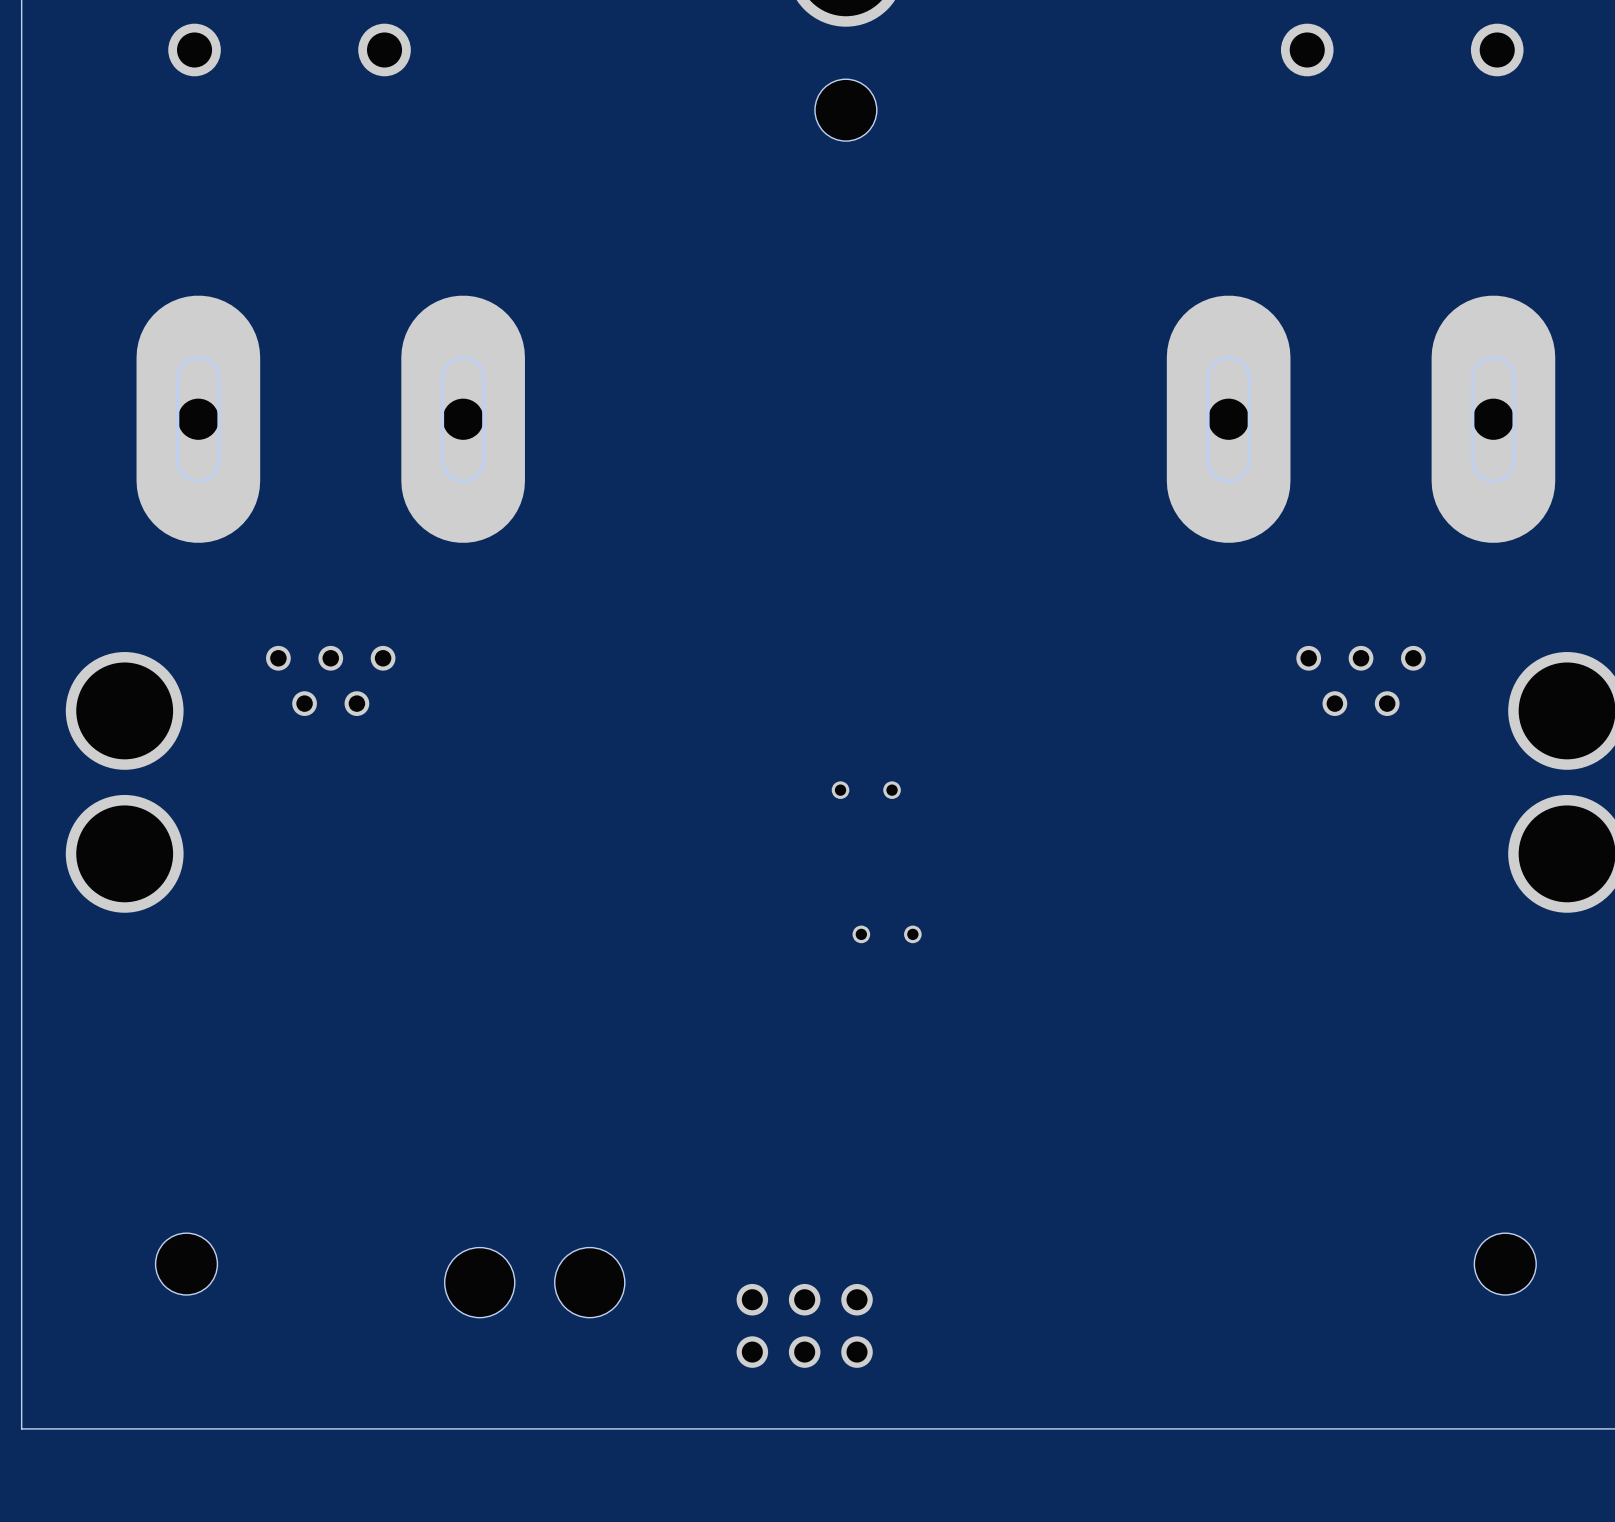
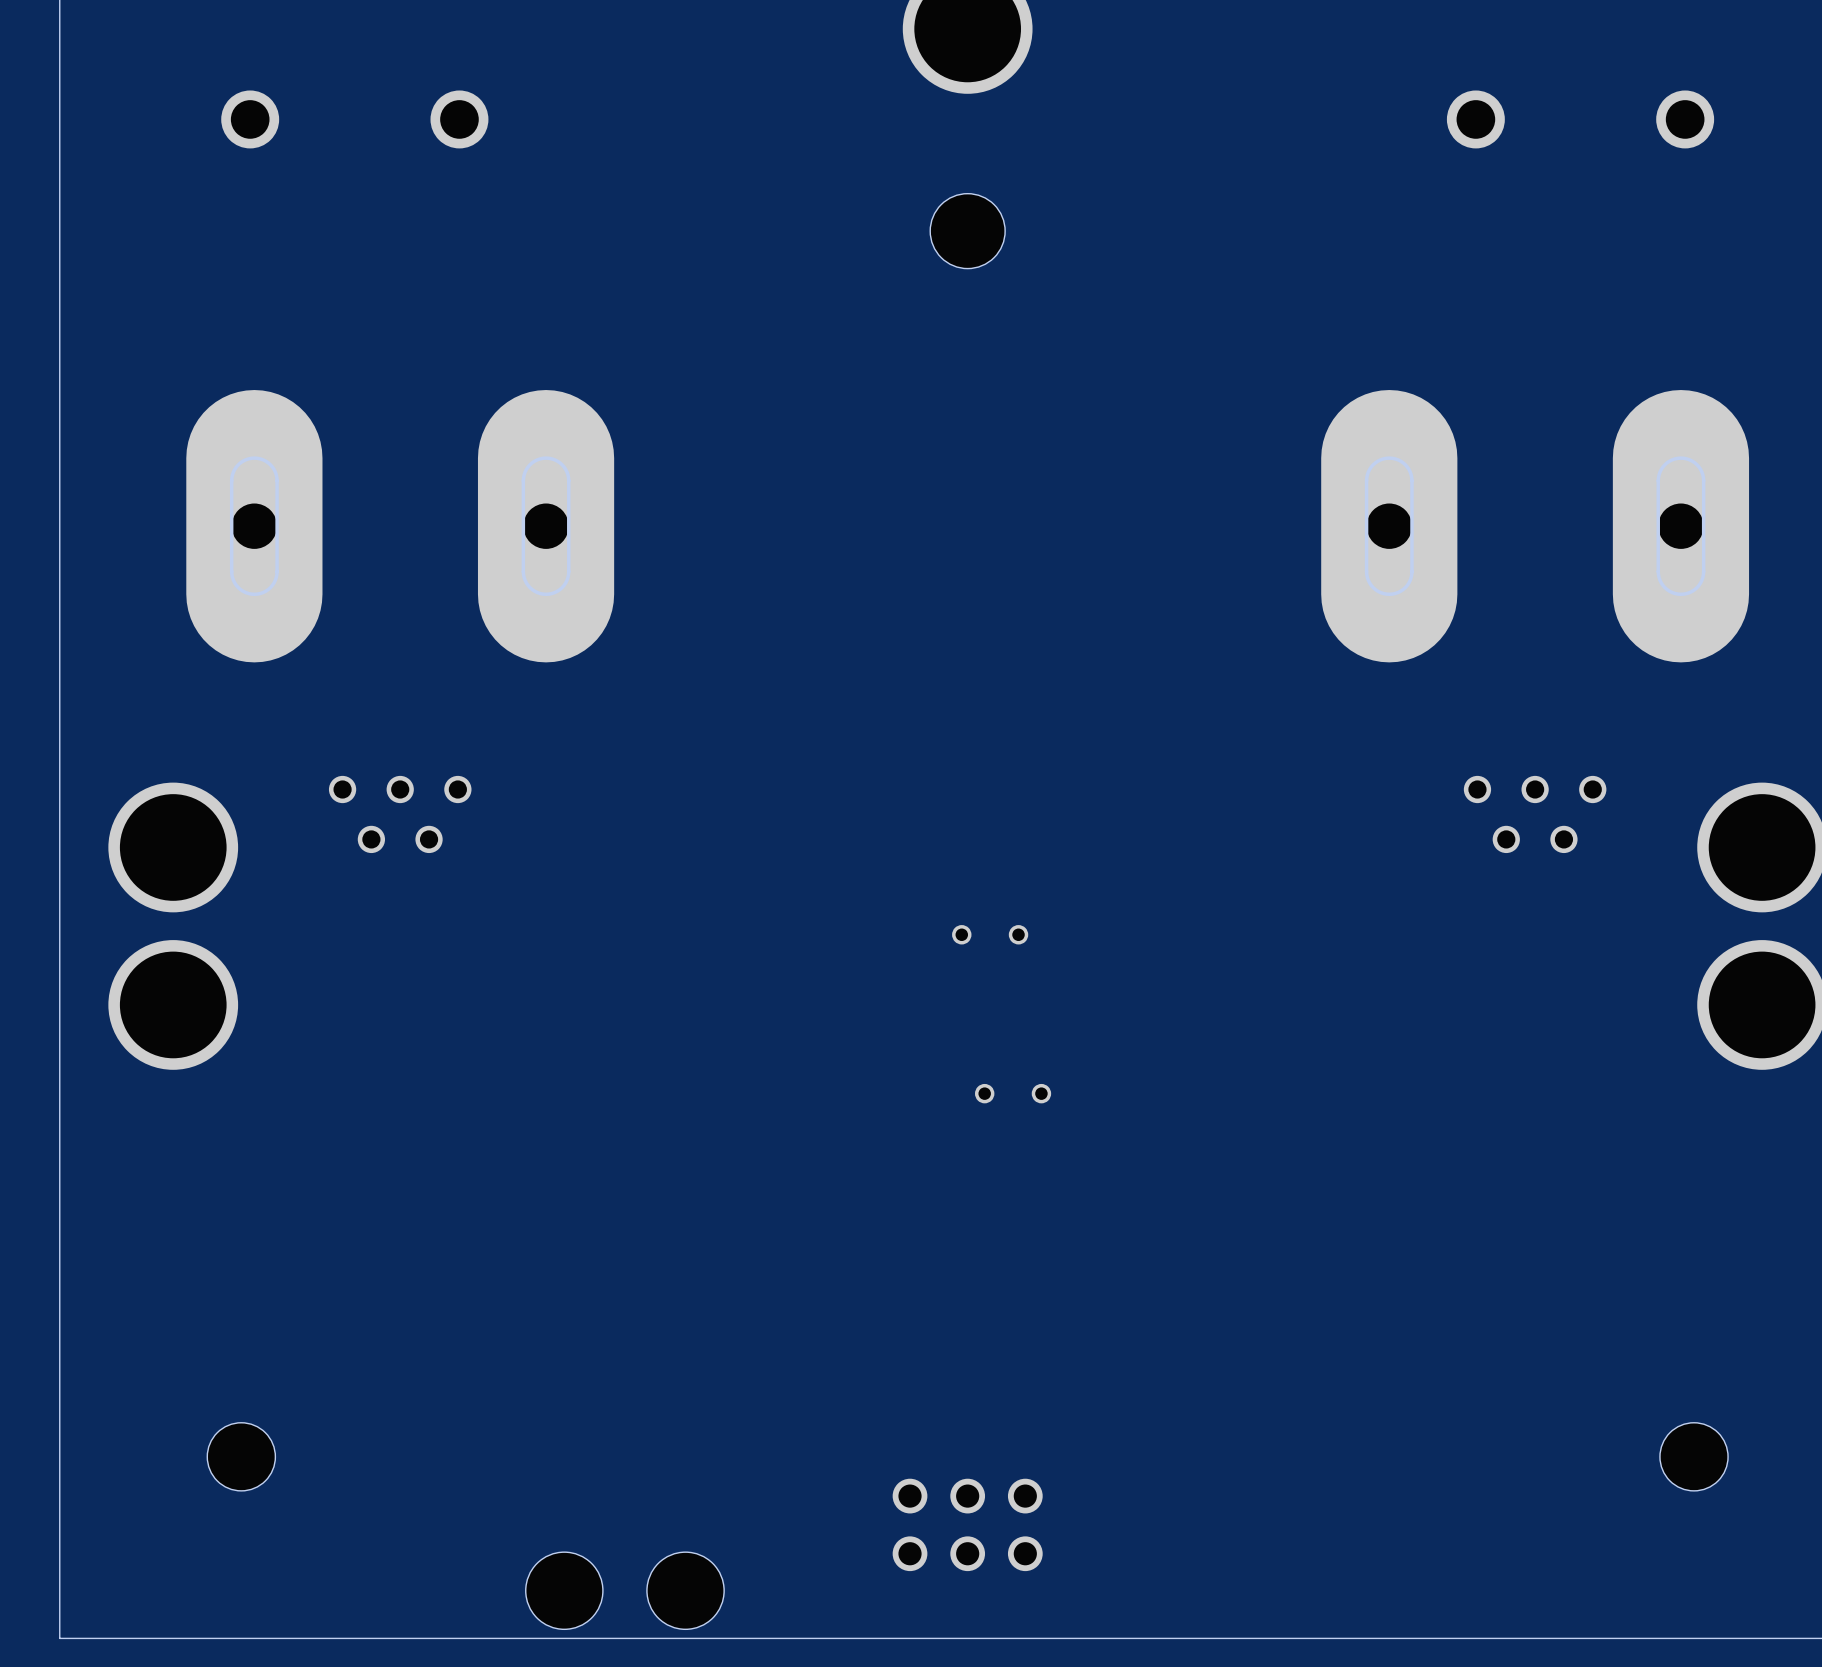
hole: (845, 110) -> none
hole: none -> (967, 231)
part position: (534, 1282) -> (624, 1590)
part position: (804, 1325) -> (967, 1524)

